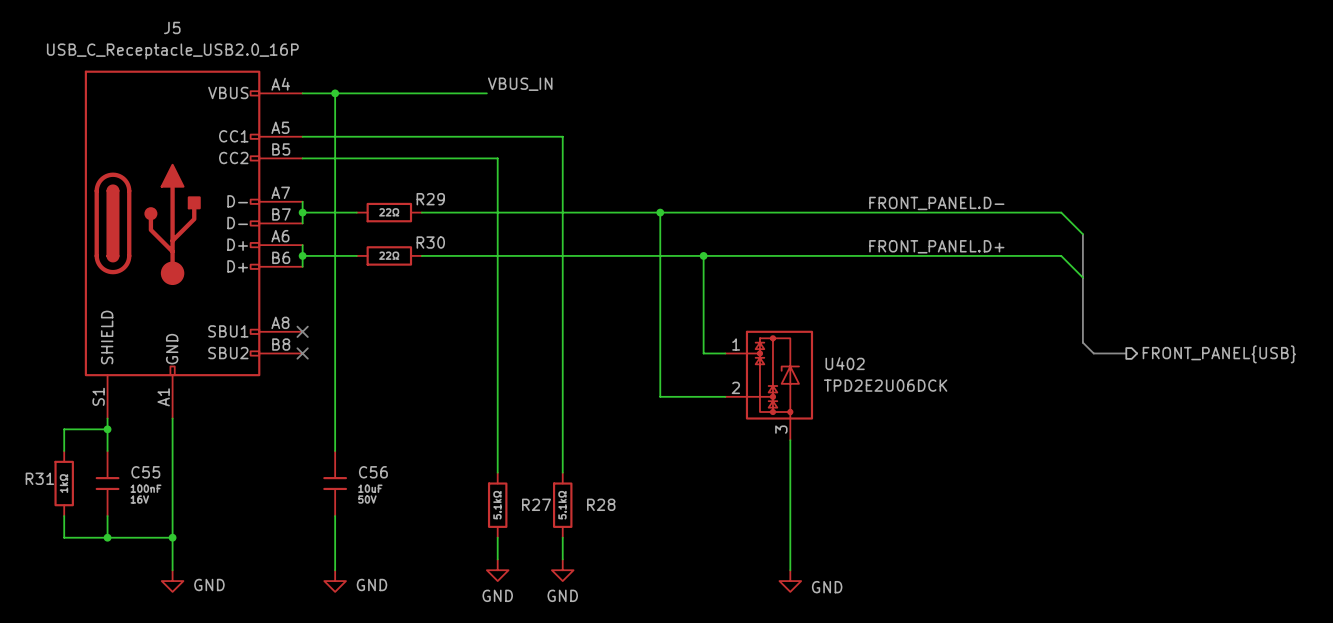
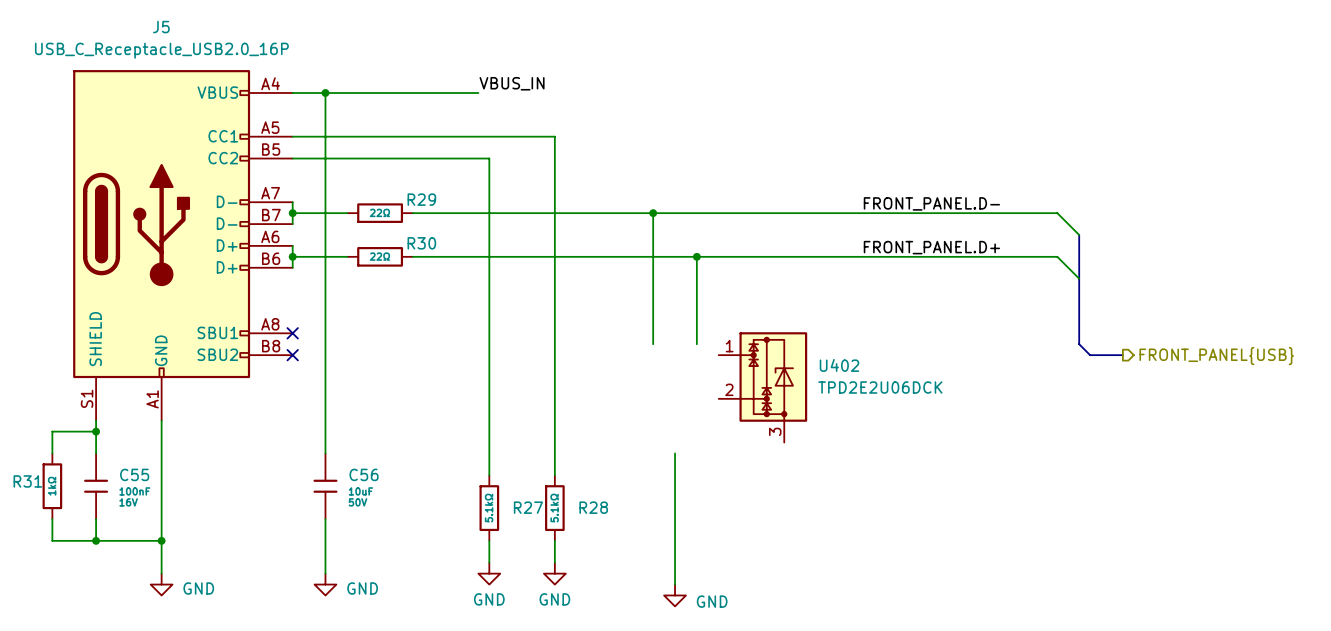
wire: (660, 342) (660, 396) (725, 396) -> none
wire: (703, 342) (703, 353) (725, 353) -> none
wire: (790, 440) (790, 570) -> (675, 453) (675, 584)
power symbol position: GND (790, 581) -> GND (675, 595)

